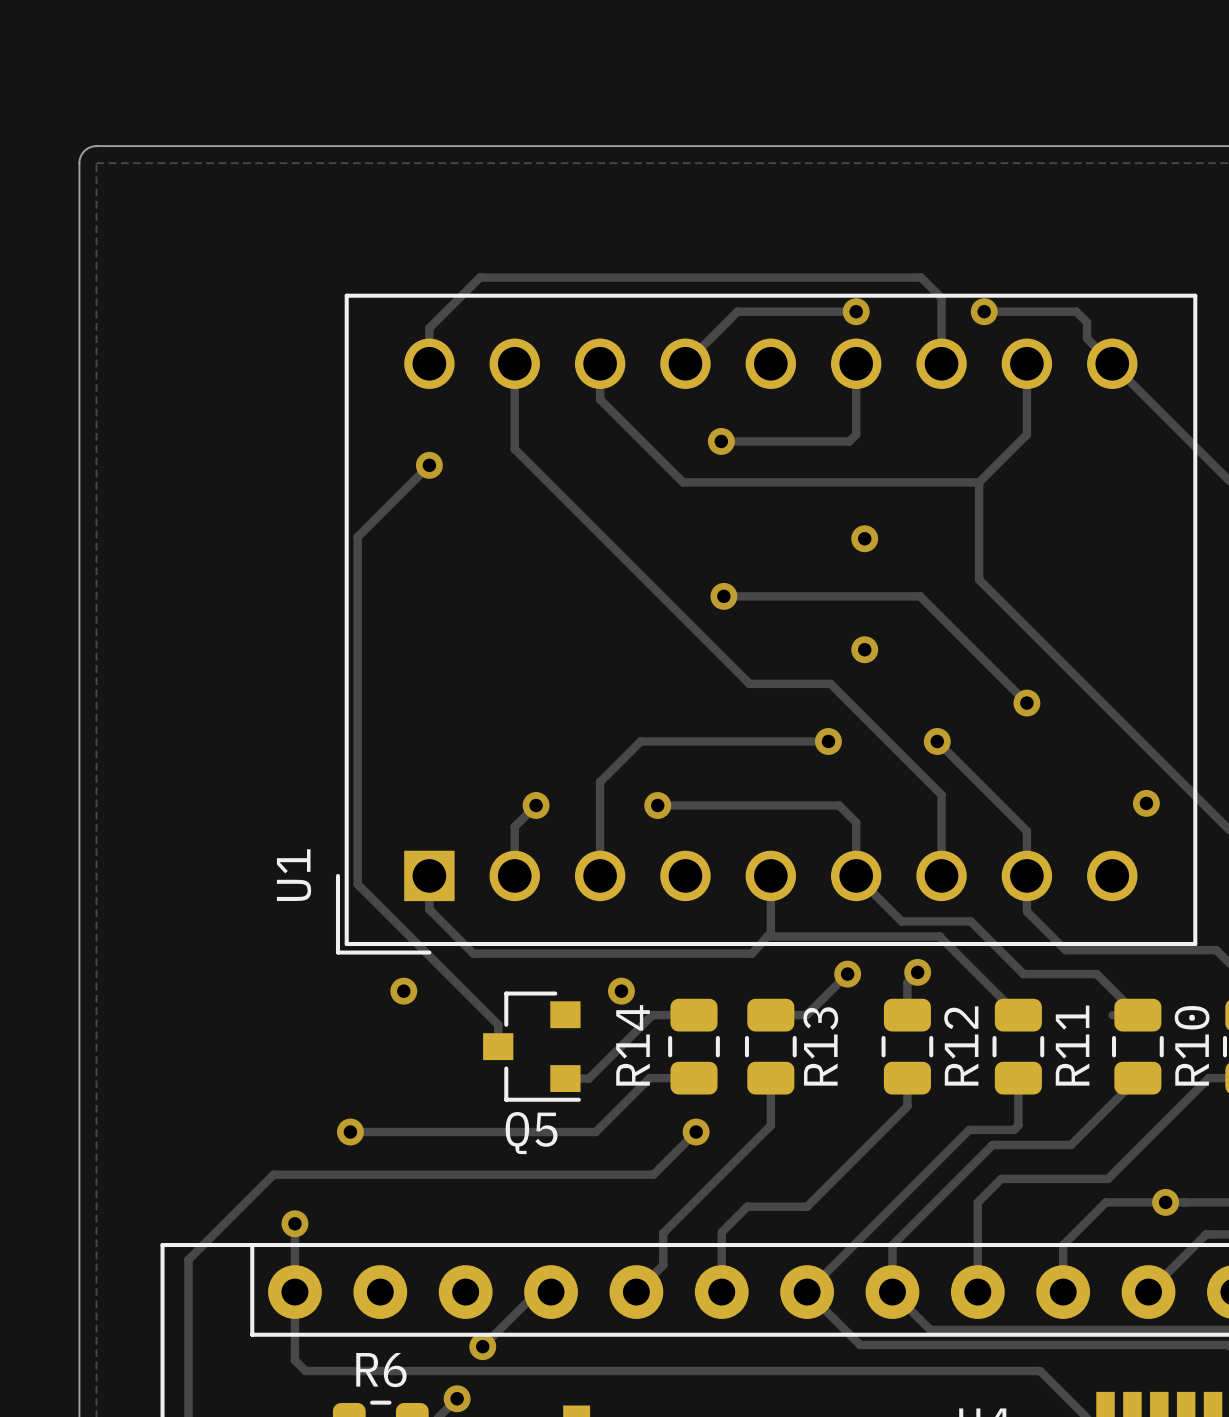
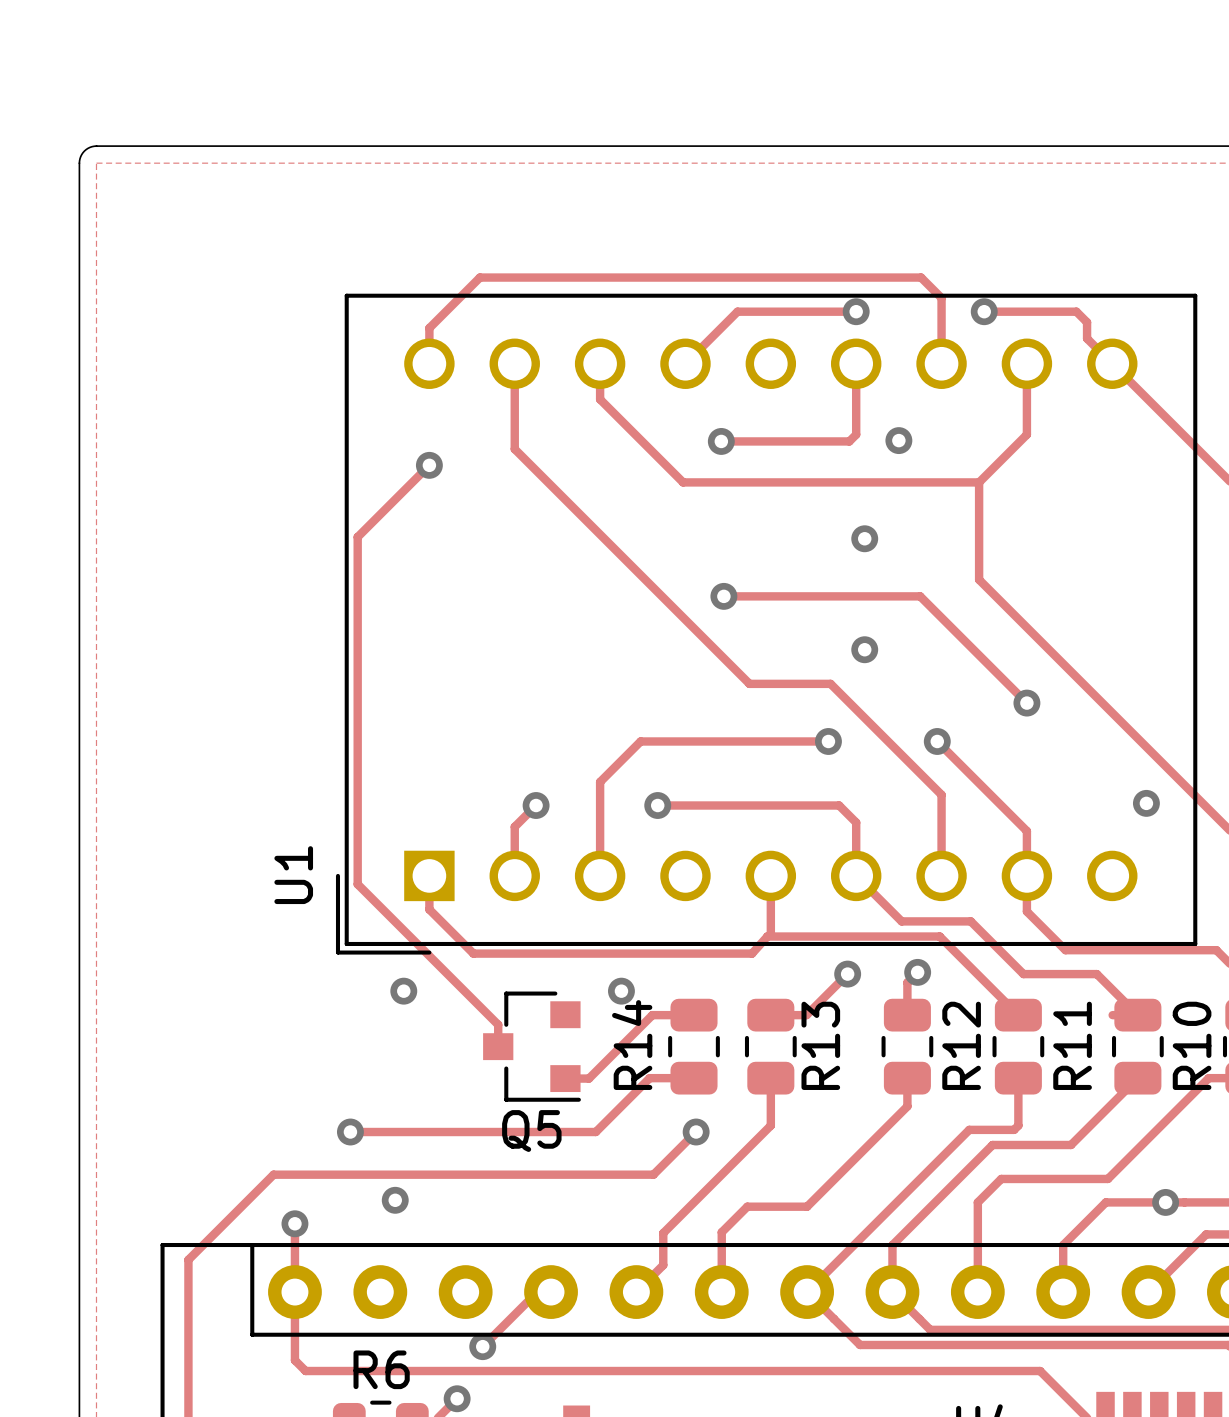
via: none -> (898, 440)
via: none -> (395, 1200)

